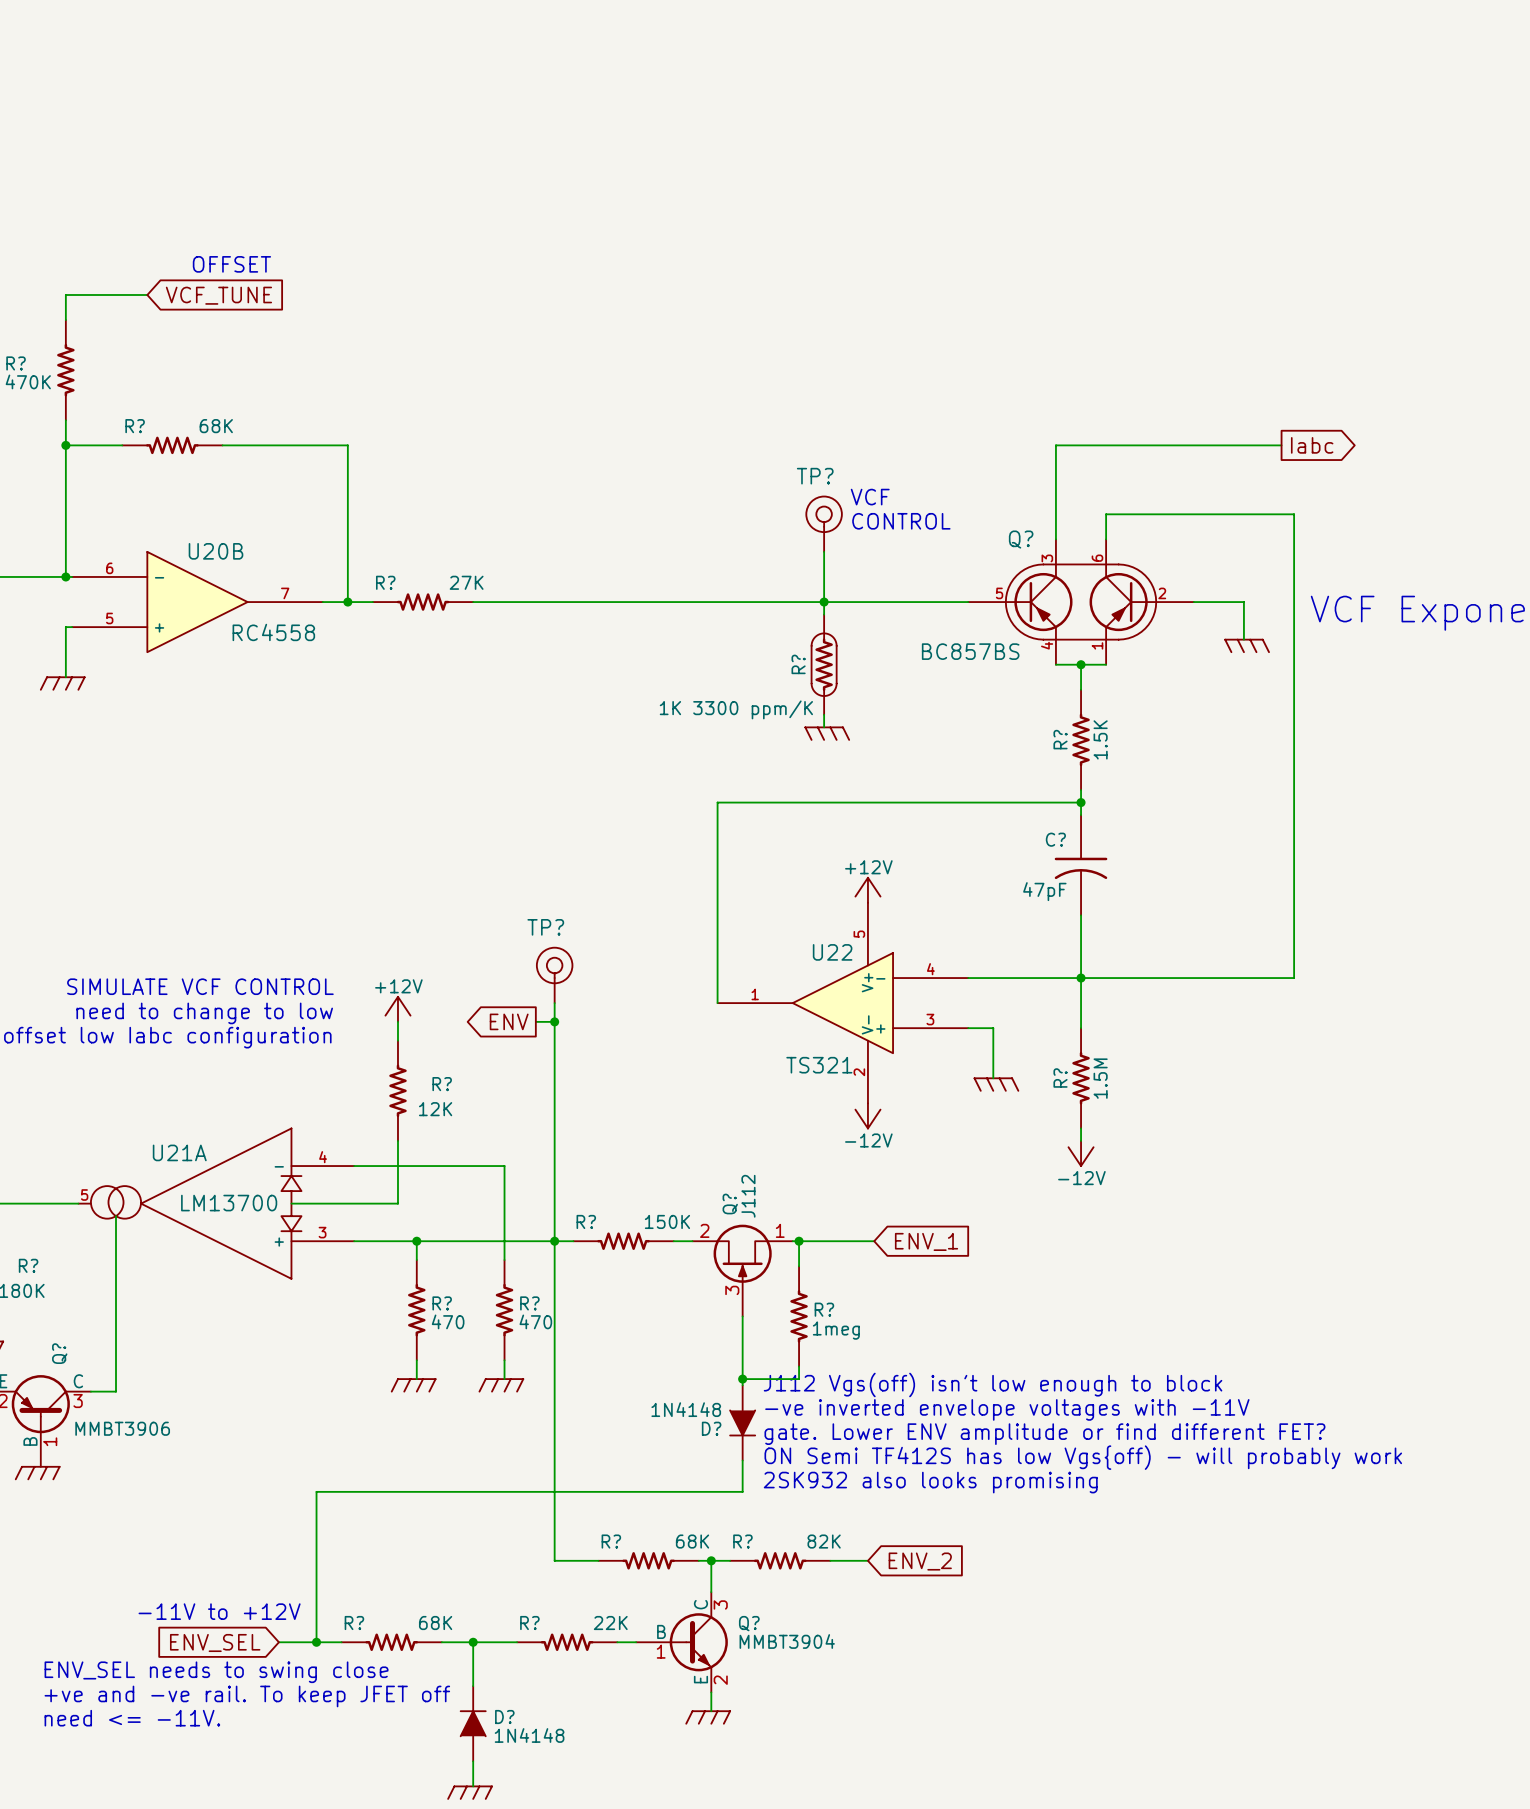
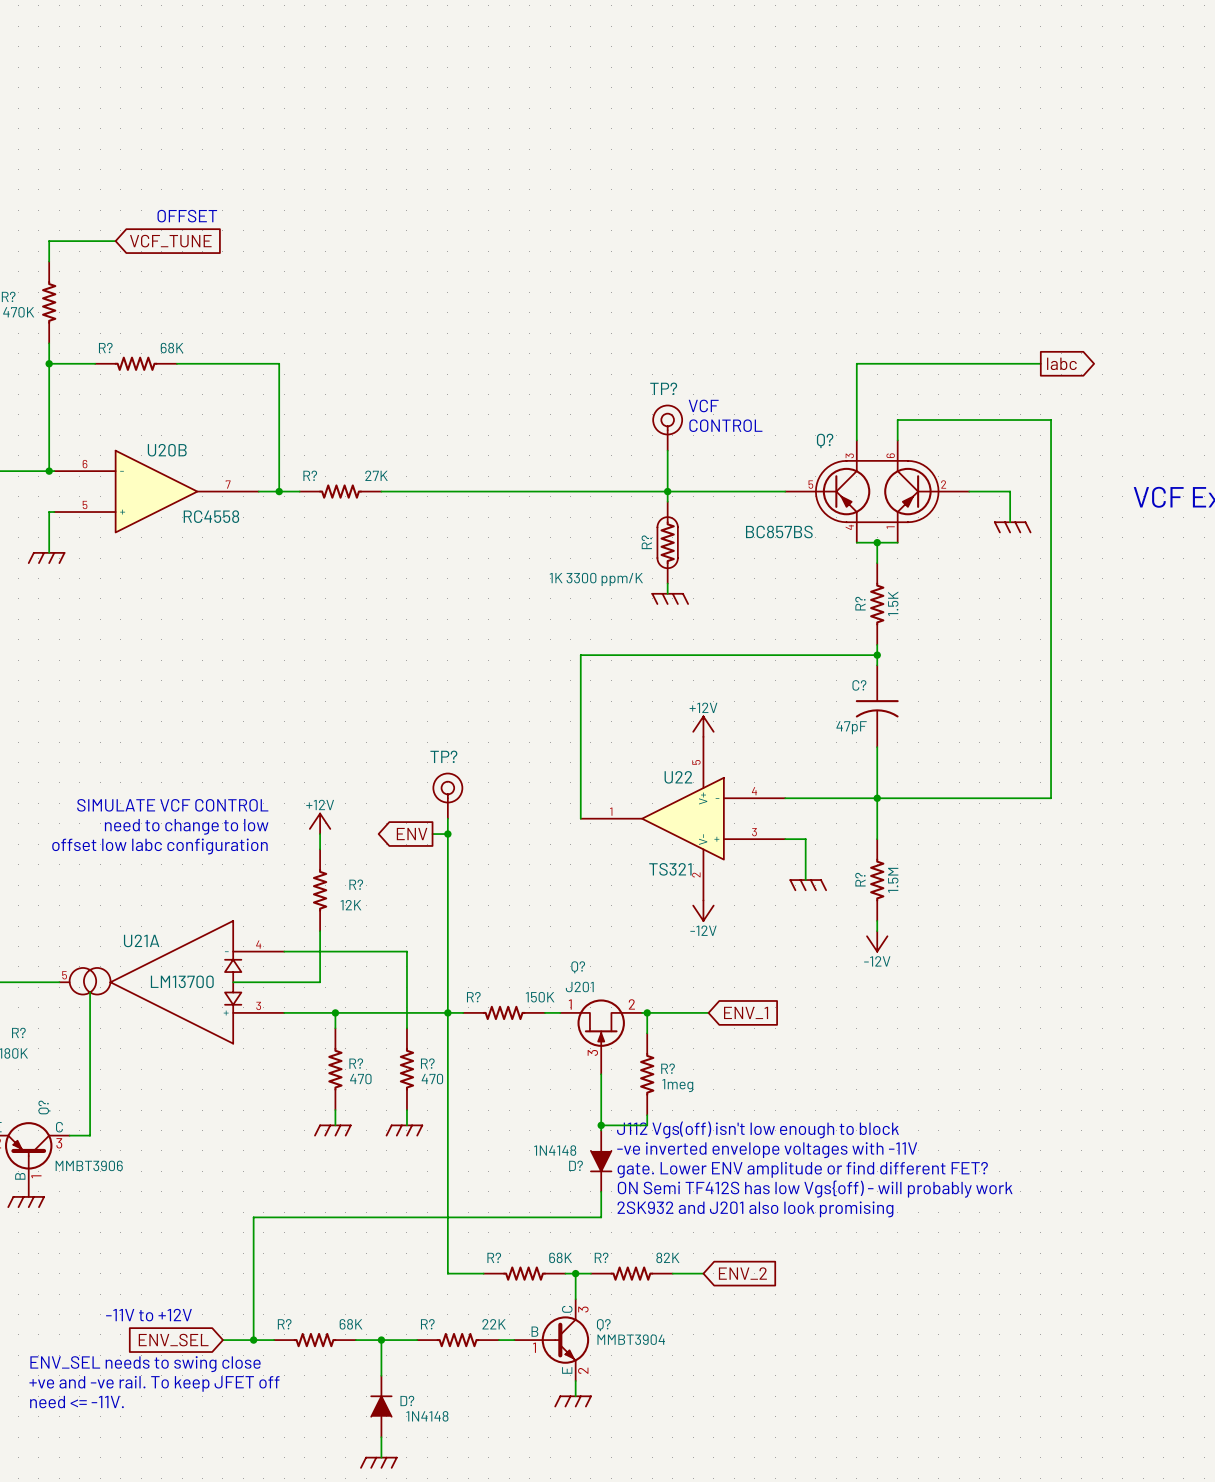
Q? value: J112 (748, 1196) -> J201 (579, 987)
Q? name rotation: 0° (730, 1204) -> 90° clockwise (578, 967)
Q? pin number: 2 (704, 1230) -> 1 (570, 1004)
Q? pin number: 1 (780, 1230) -> 2 (631, 1004)
text: 2SK932 also looks promising (930, 1482) -> 2SK932 and J201 also look promising (755, 1209)

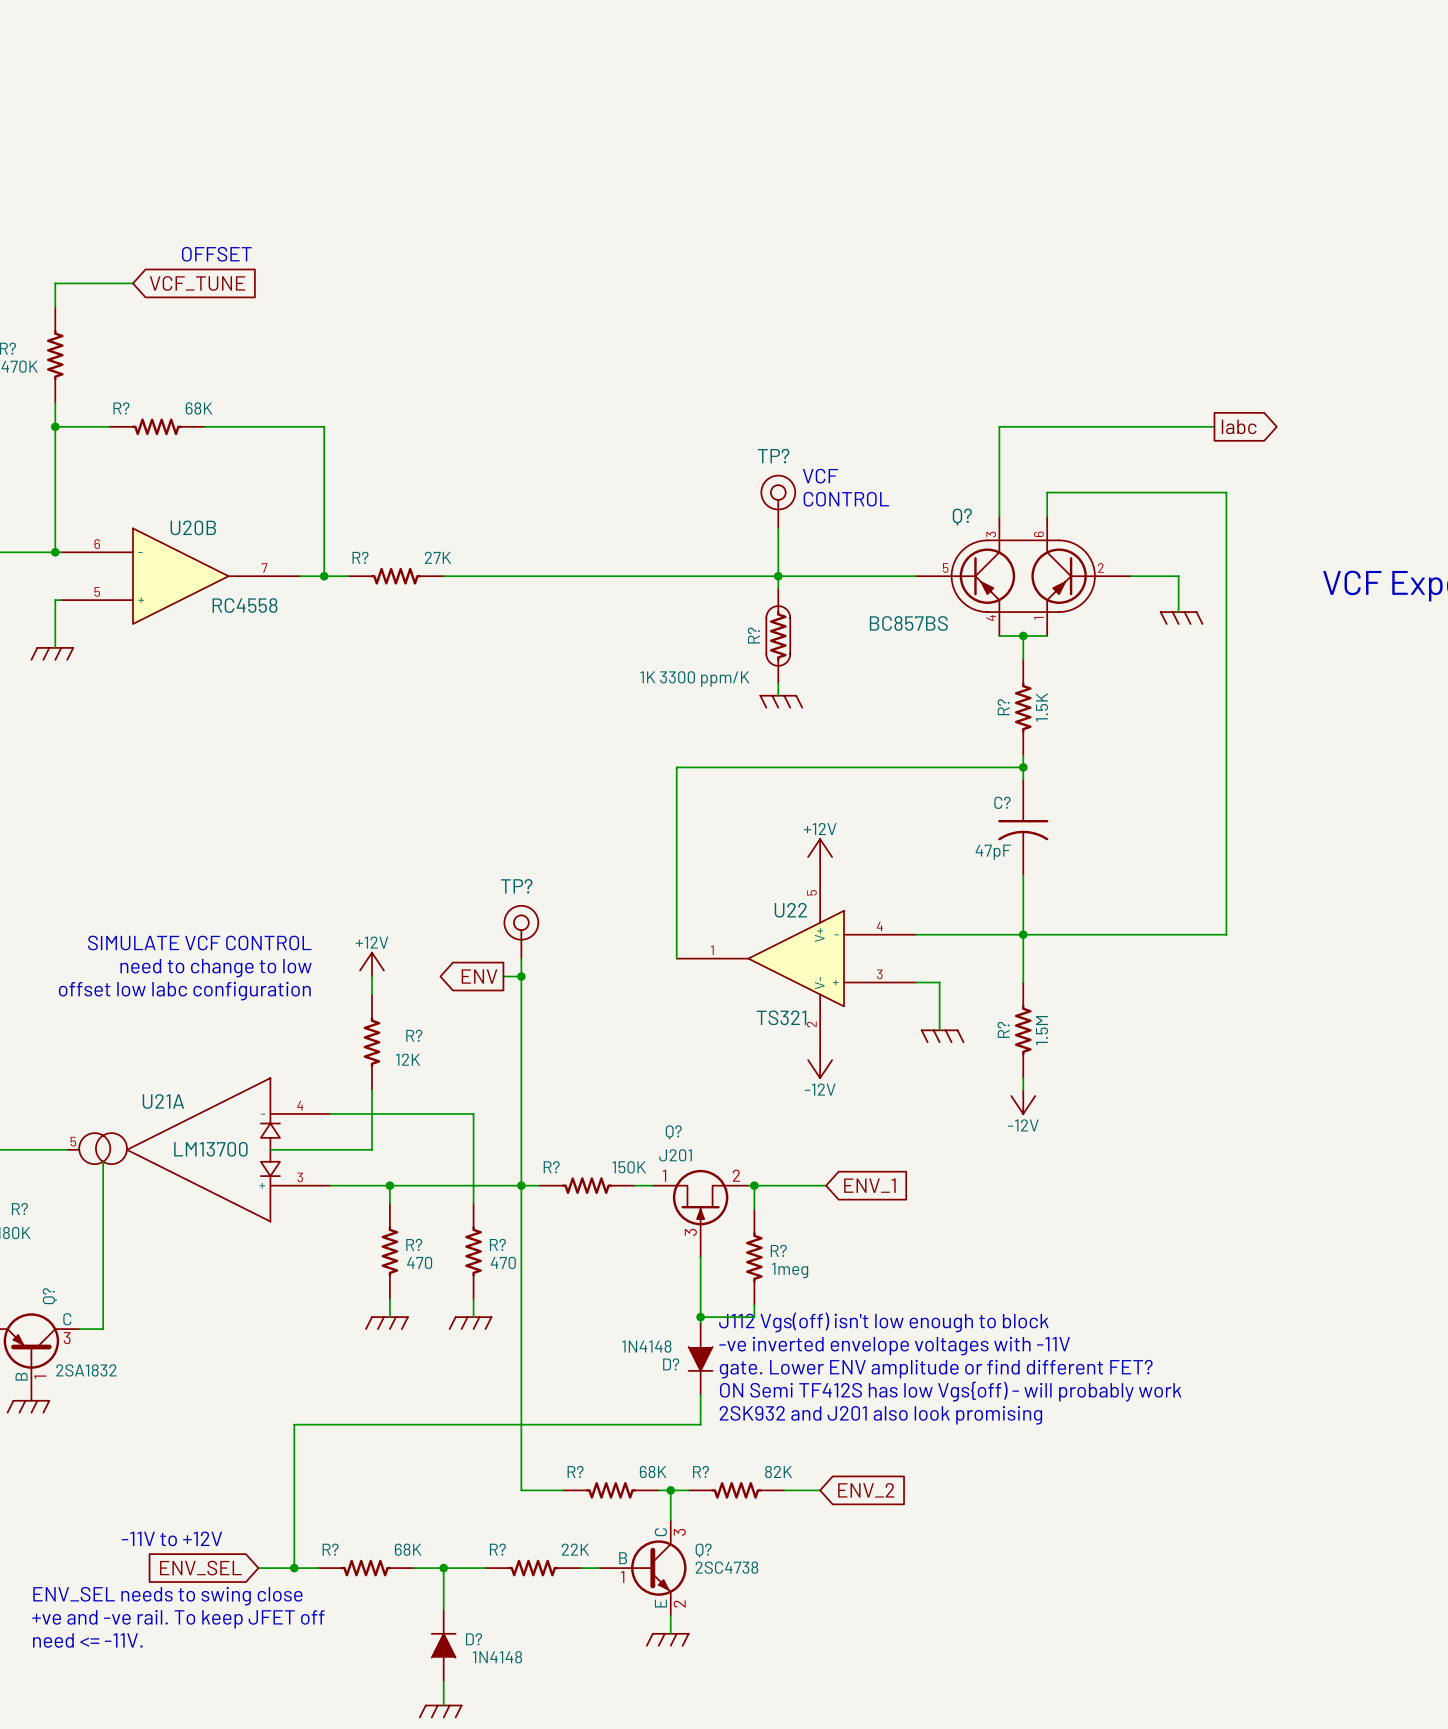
Q? value: MMBT3906 (89, 1165) -> 2SA1832 (86, 1370)
Q? value: MMBT3904 (631, 1339) -> 2SC4738 (726, 1567)

